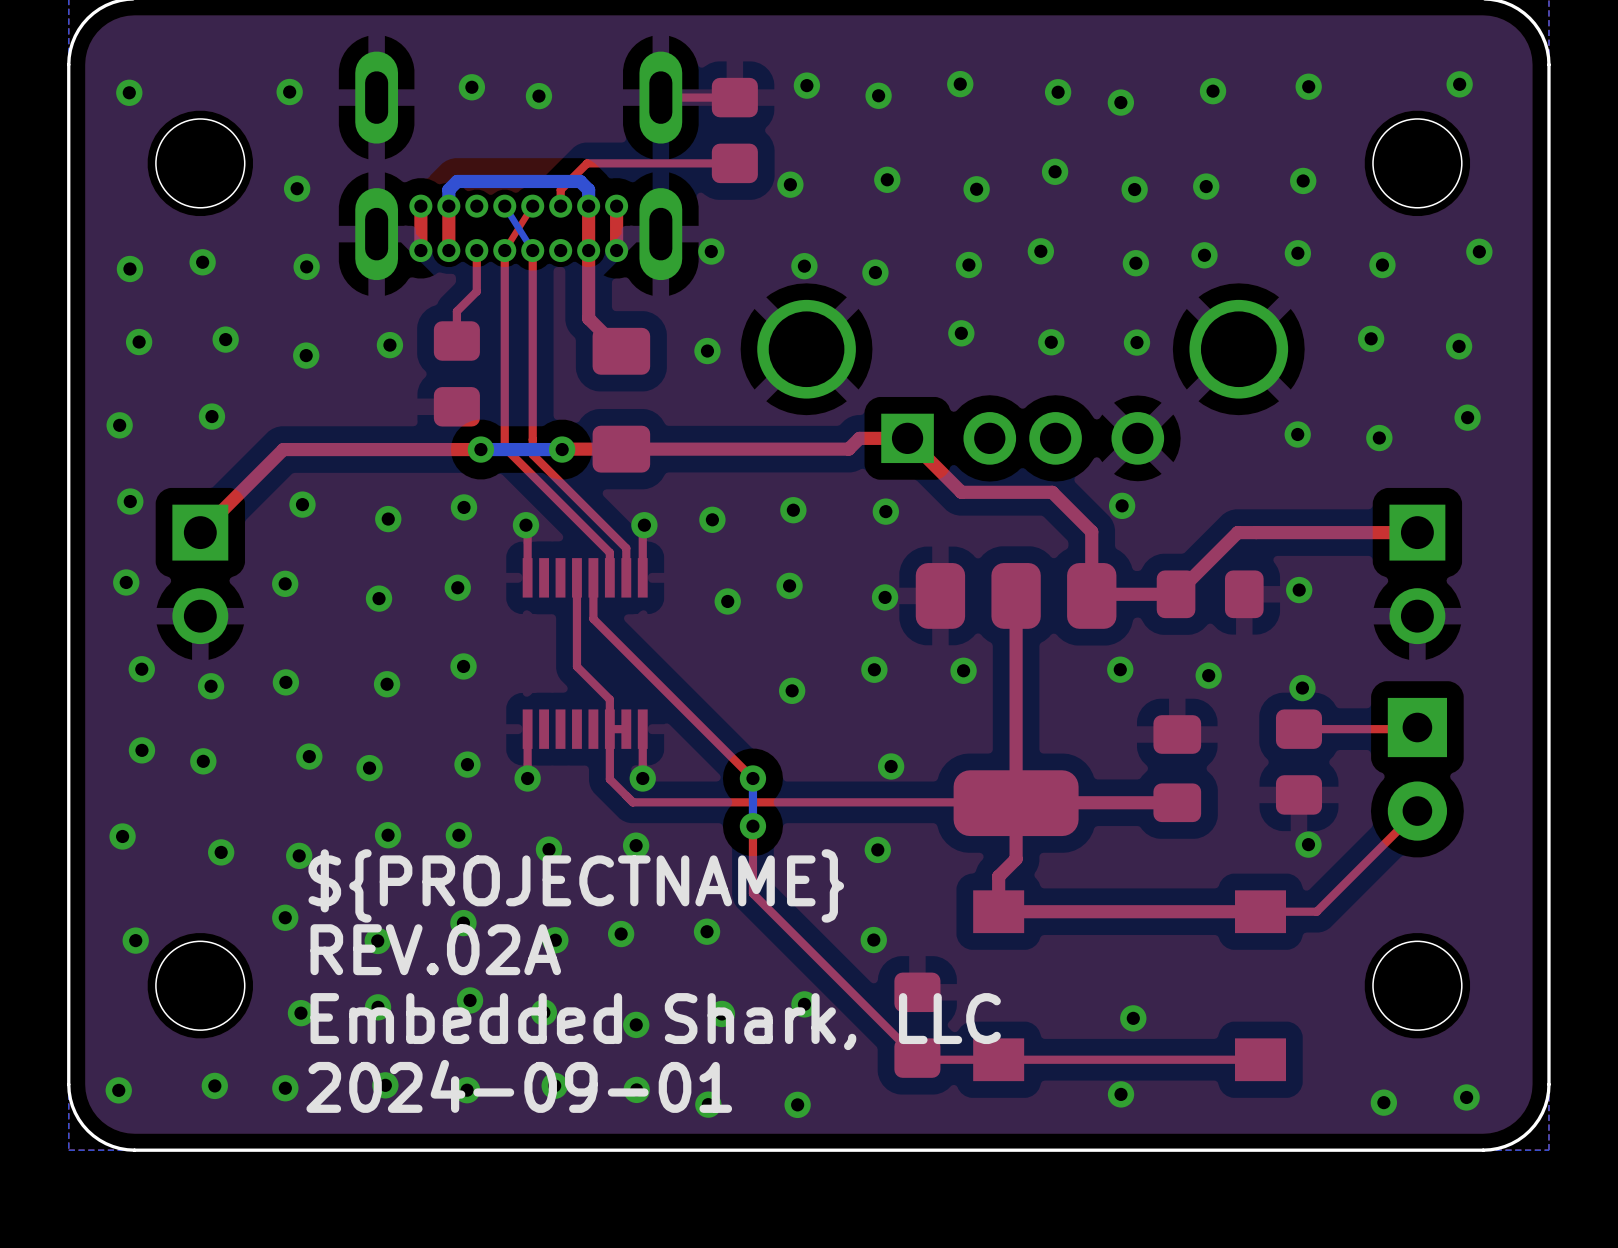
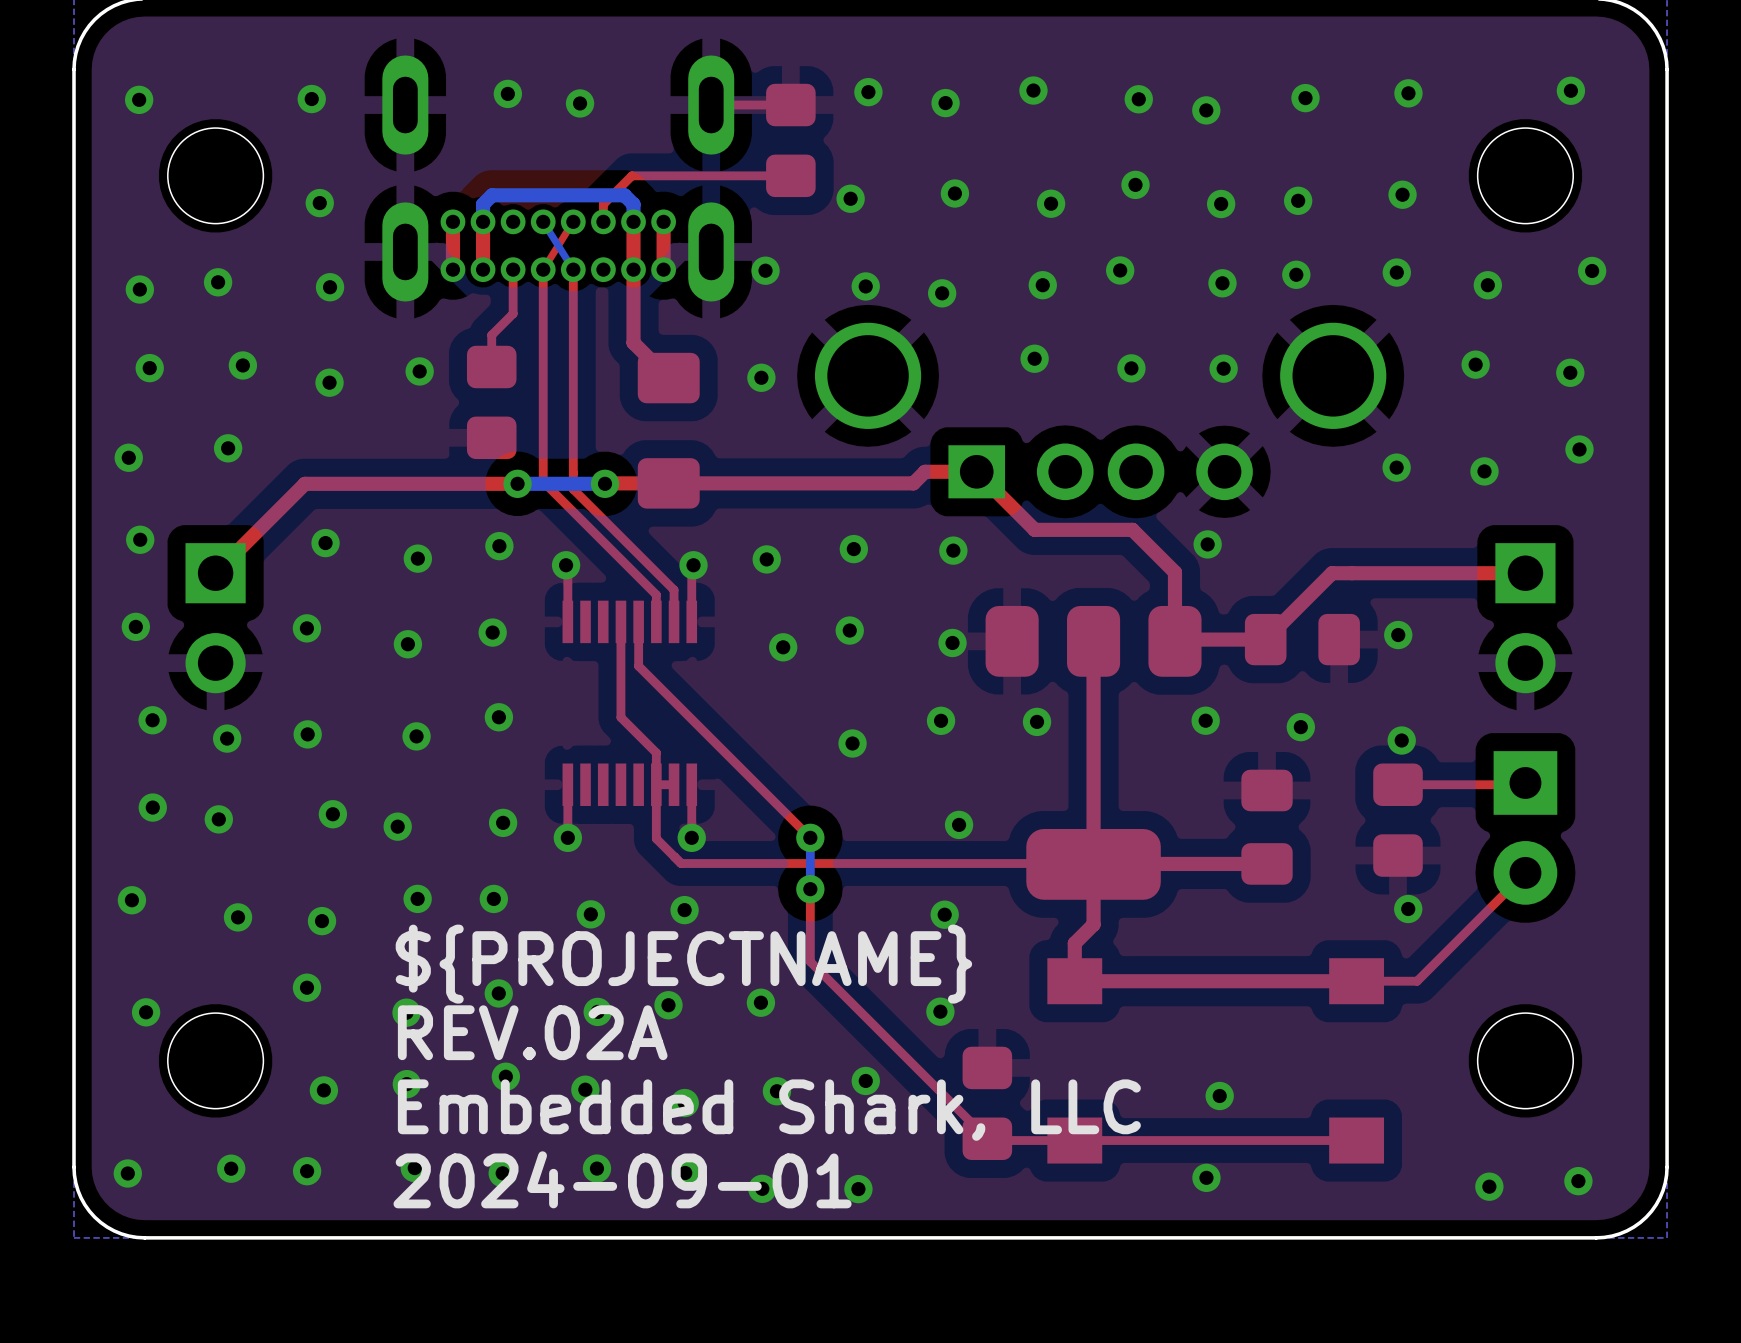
text position: ${PROJECTNAME} (576, 885) -> ${PROJECTNAME} (683, 964)
text position: REV.02A (435, 949) -> REV.02A (532, 1032)
text position: Embedded Shark, LLC (655, 1021) -> Embedded Shark, LLC (769, 1110)
text position: 2024-09-01 (519, 1086) -> 2024-09-01 (622, 1179)

